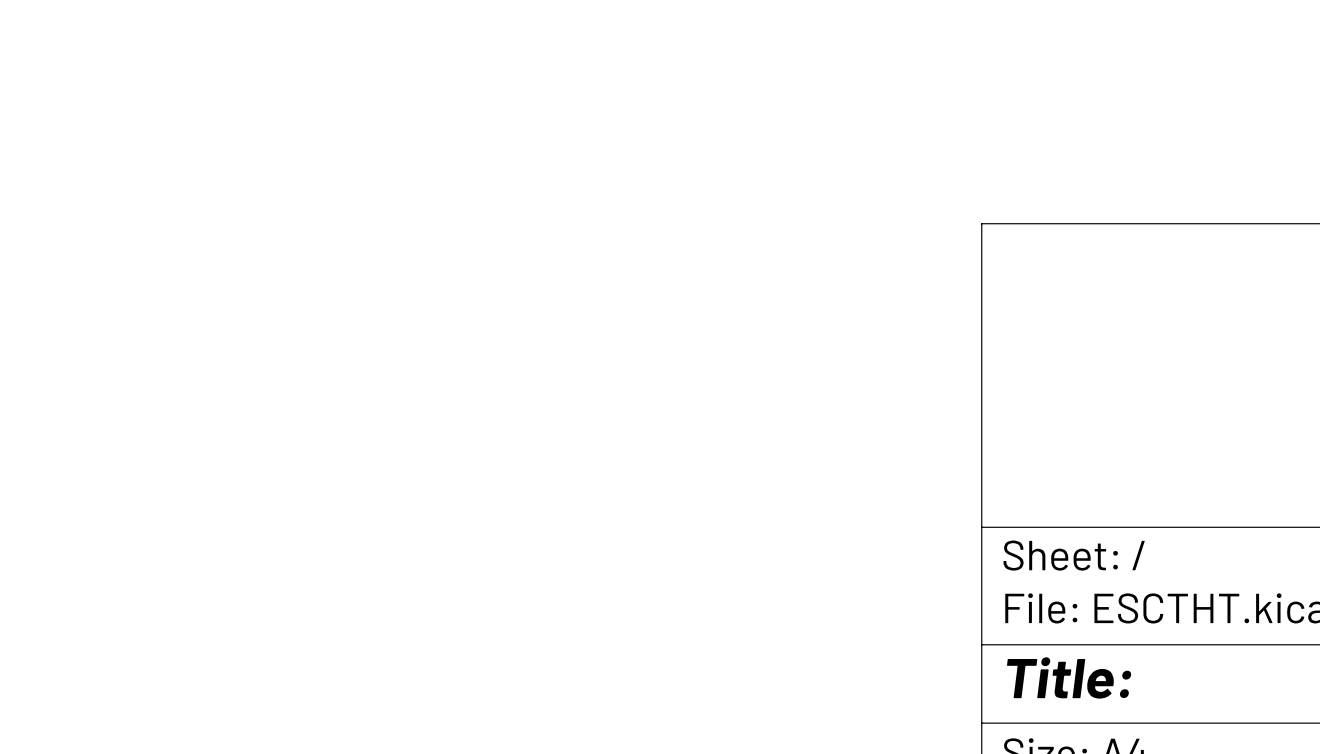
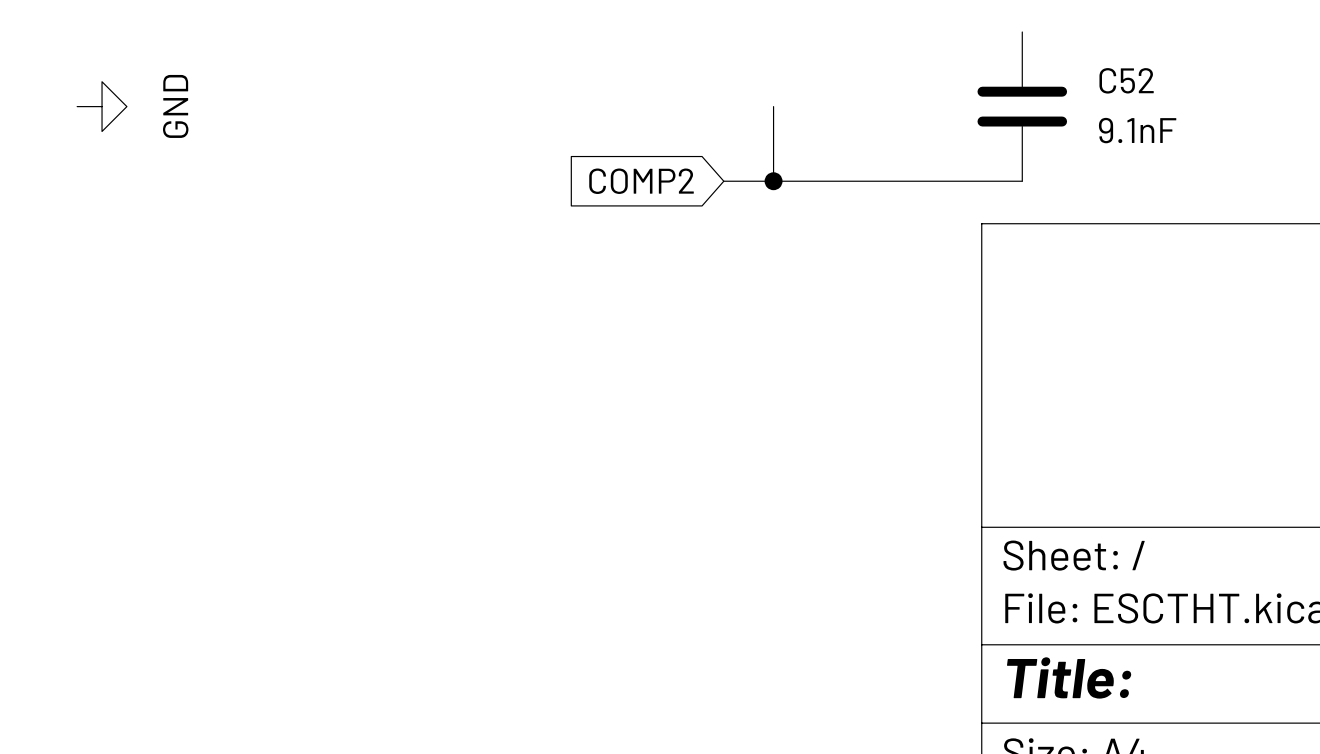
power symbol: none -> GND (102, 106)
wire: none -> (773, 106) (773, 181)
C52: none -> 9.1nF (1022, 106)
global label: none -> COMP2 (641, 181)
wire: none -> (723, 181) (1022, 181)
junction: none -> (773, 181)

